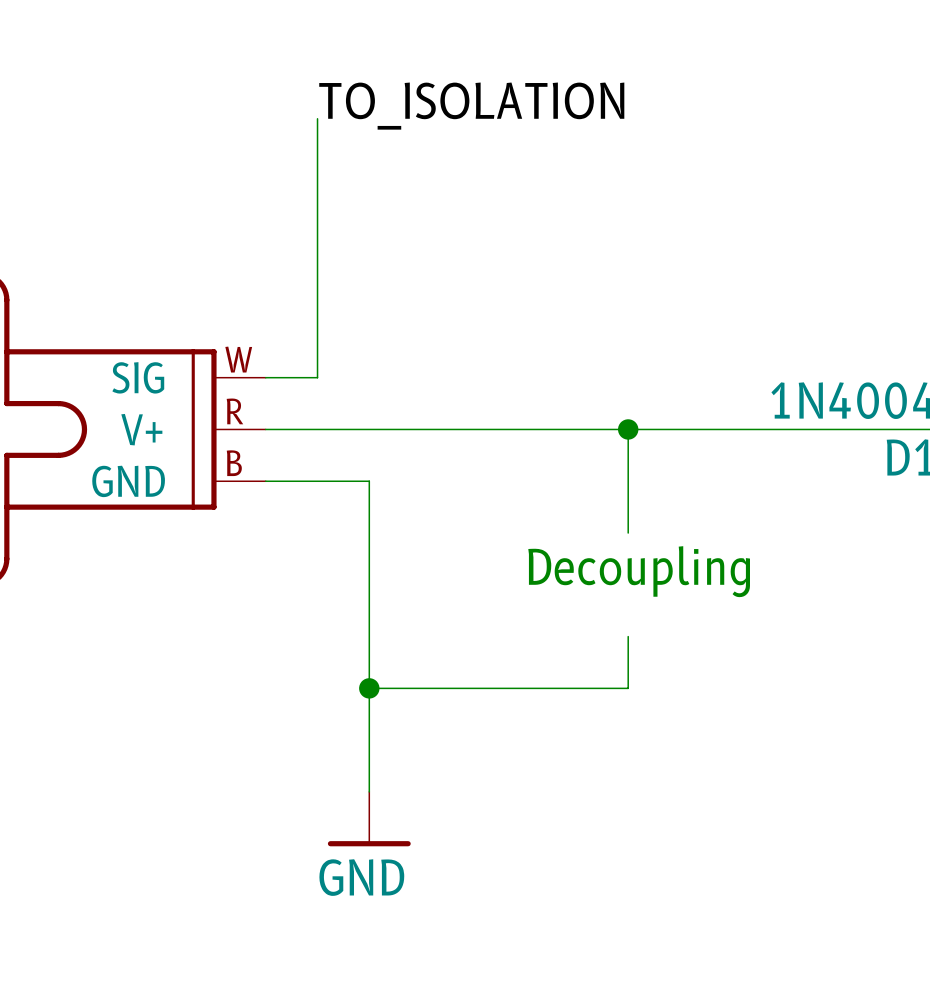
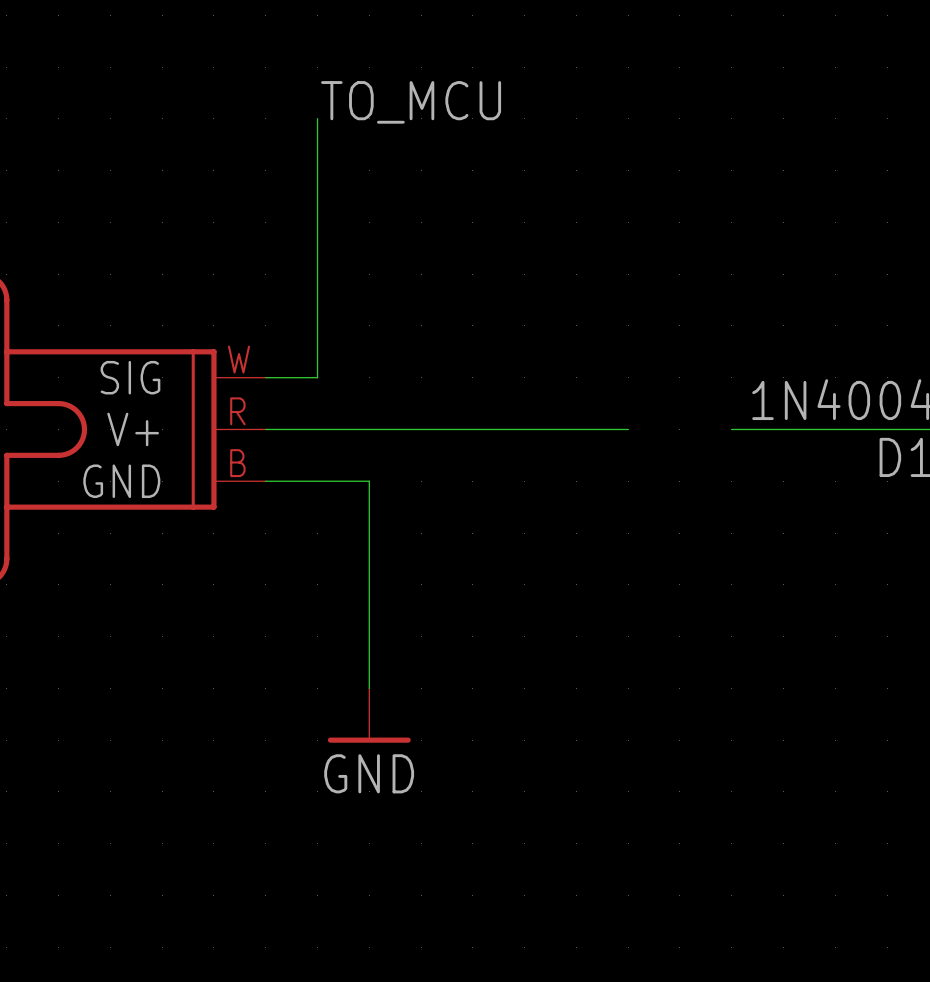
label: TO_ISOLATION (471, 106) -> TO_MCU (411, 102)
junction: (628, 429) -> none
wire: (731, 429) (628, 429) (628, 533) -> none
text: Decoupling (639, 571) -> none
wire: (628, 636) (628, 688) (369, 688) (369, 791) -> none
junction: (369, 688) -> none
power symbol position: GND (369, 819) -> GND (369, 715)

